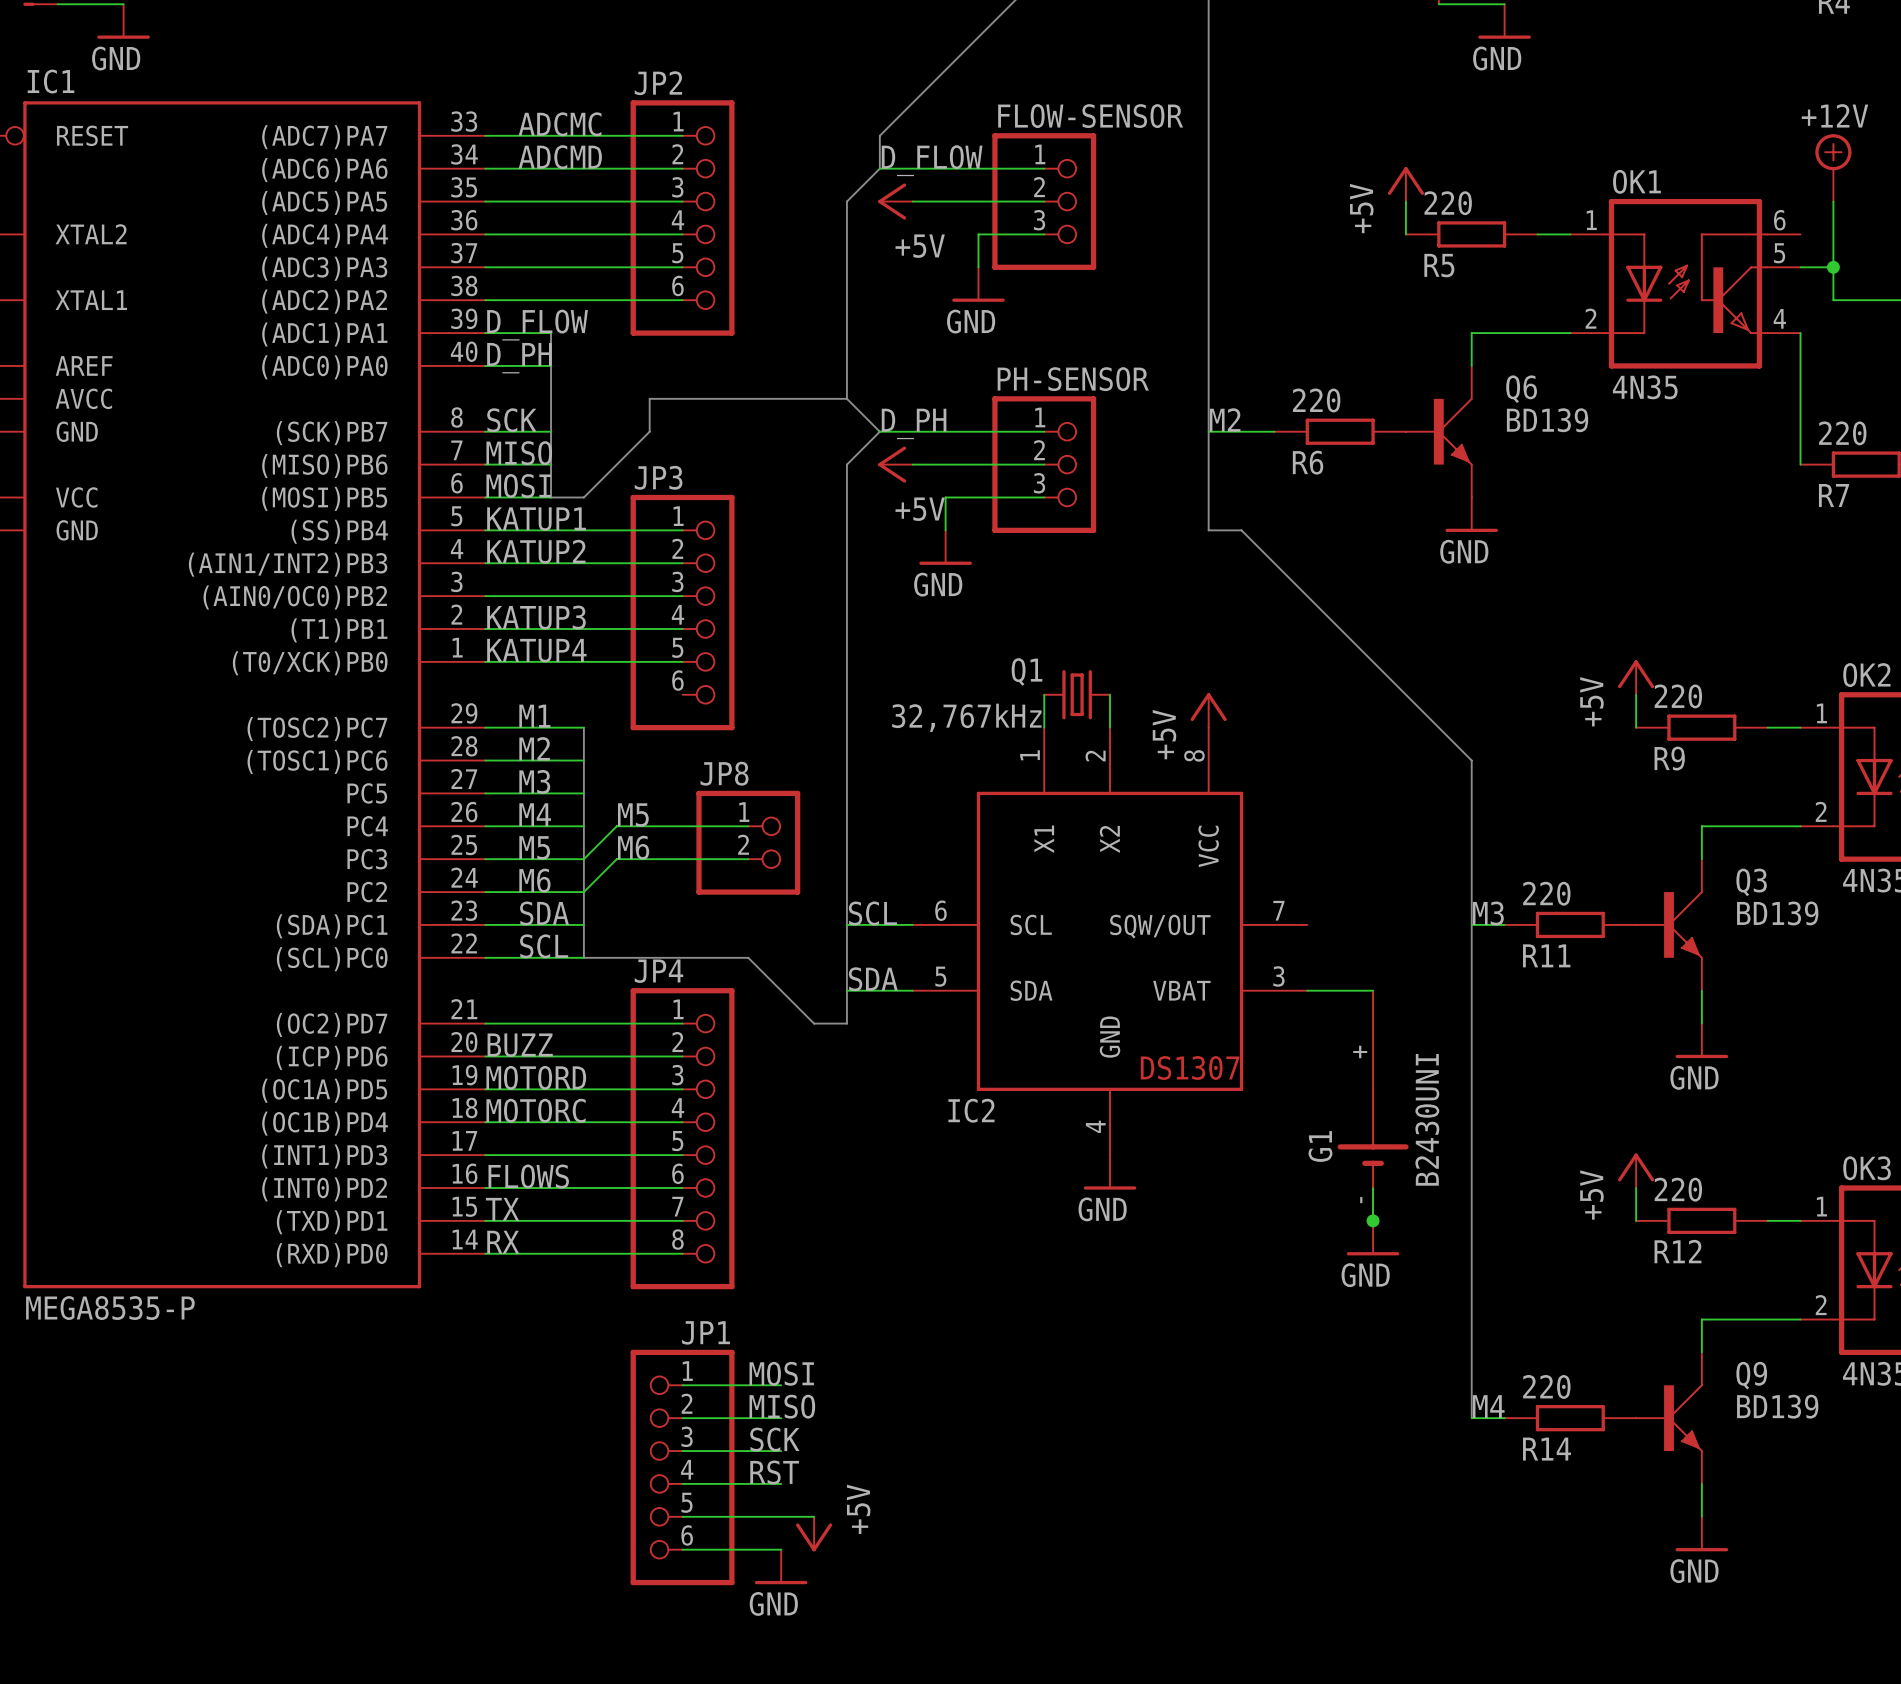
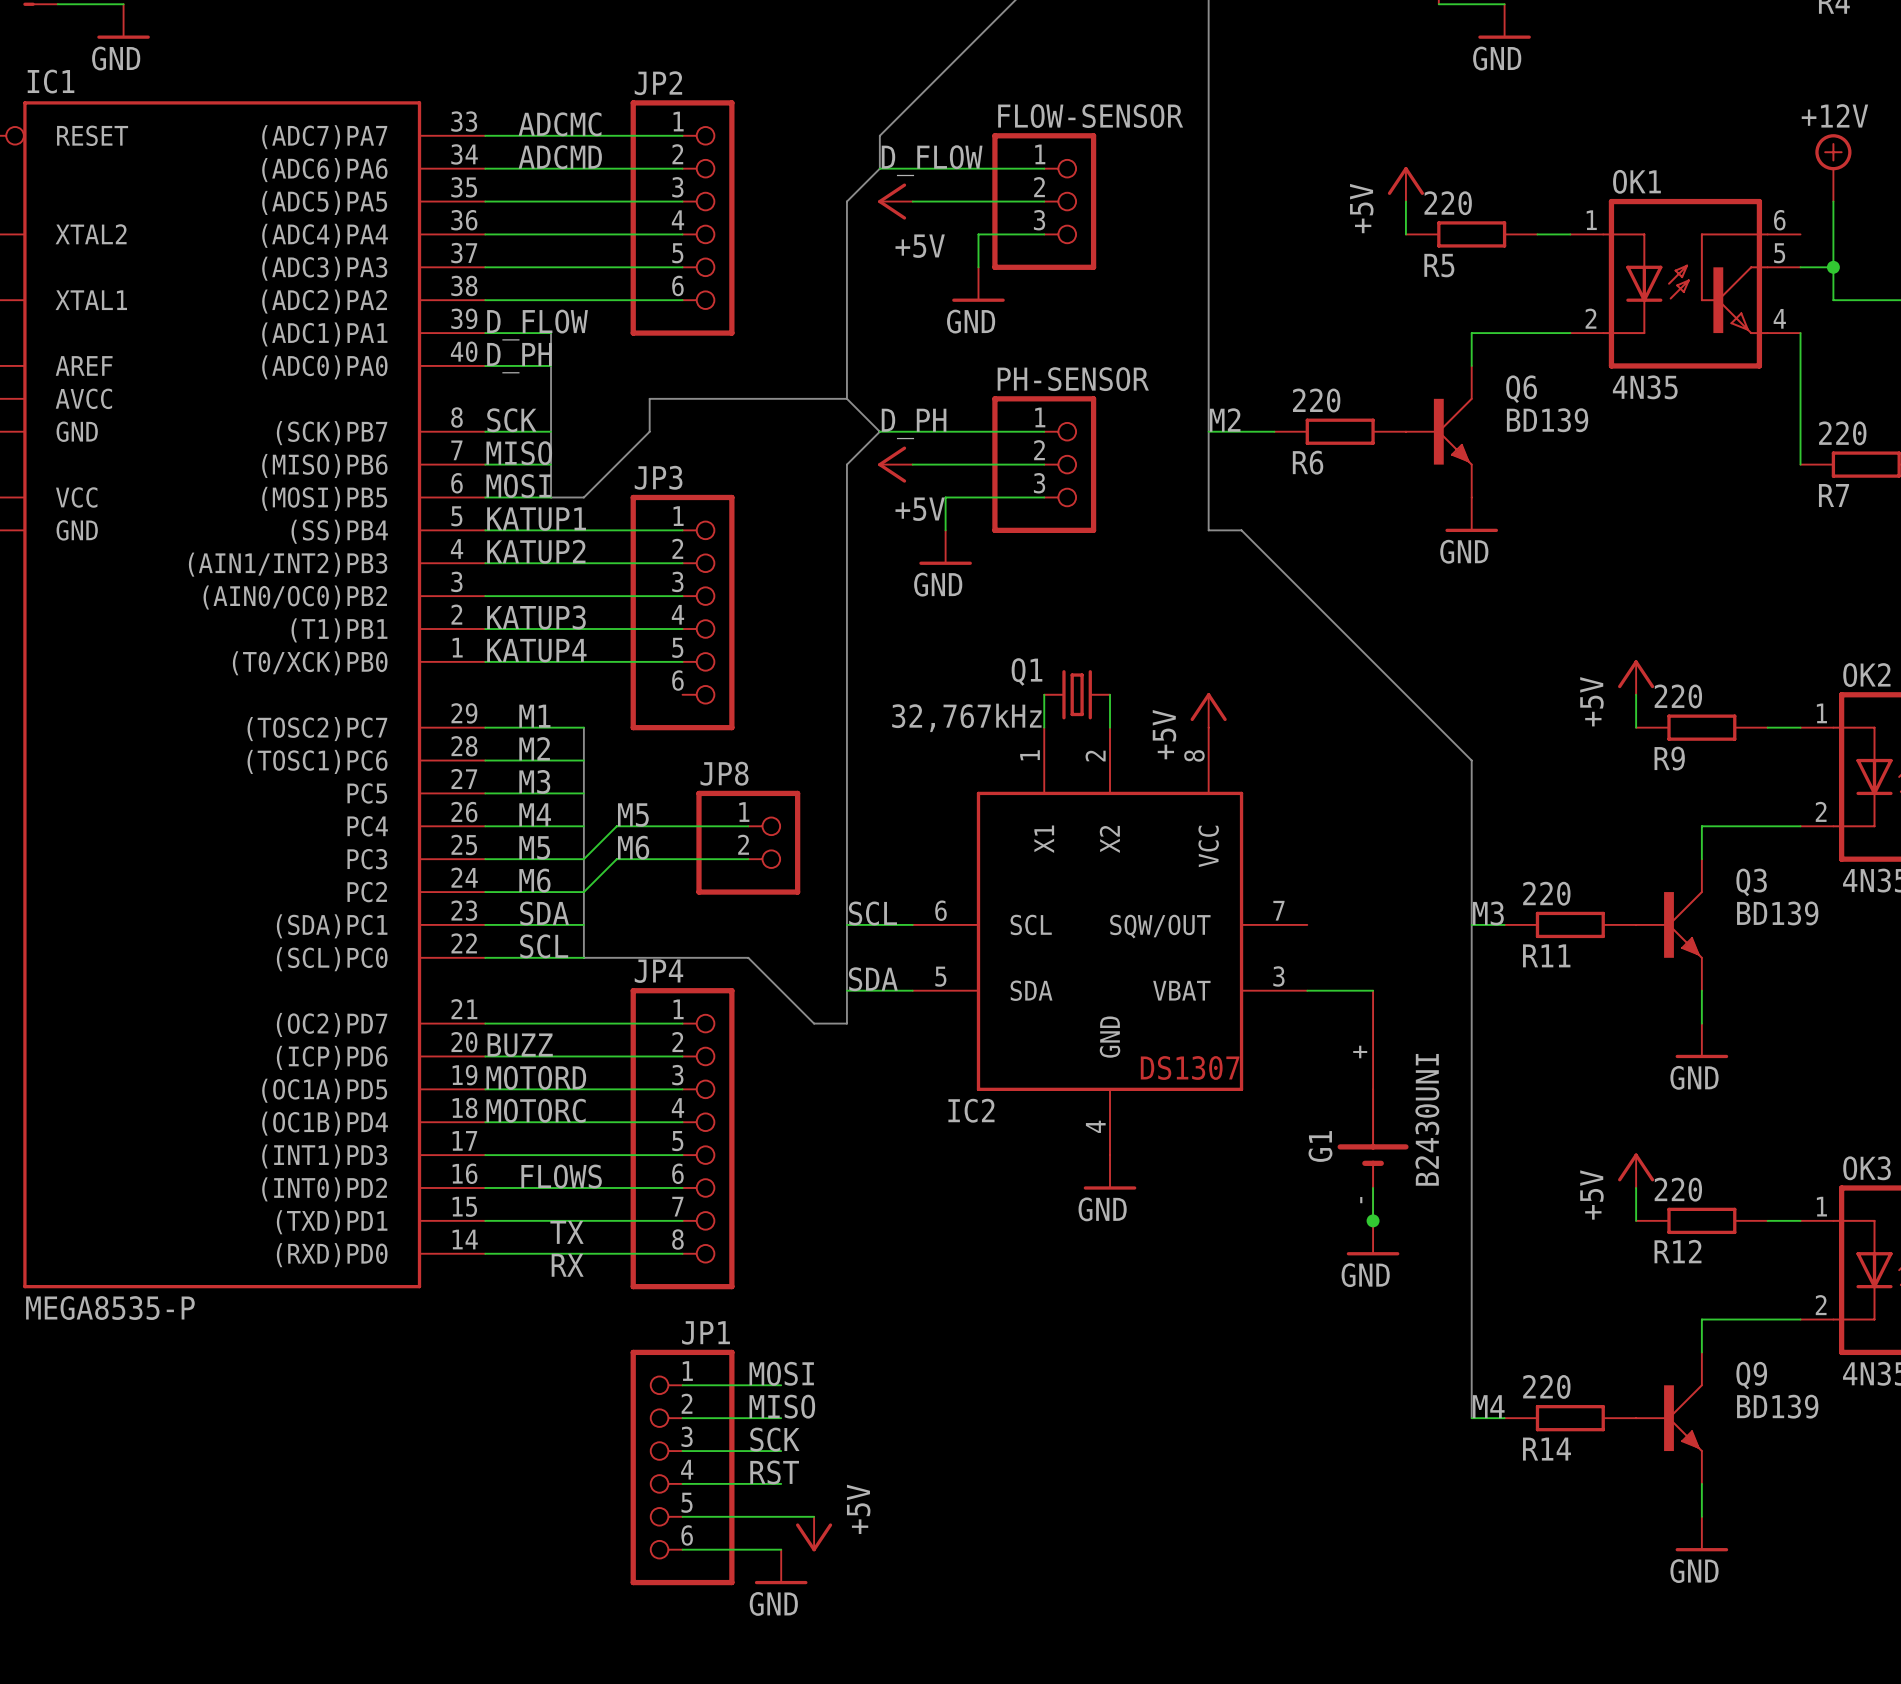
label position: FLOWS (528, 1176) -> FLOWS (561, 1176)
label position: TX (502, 1209) -> TX (567, 1232)
label position: RX (503, 1242) -> RX (567, 1265)

